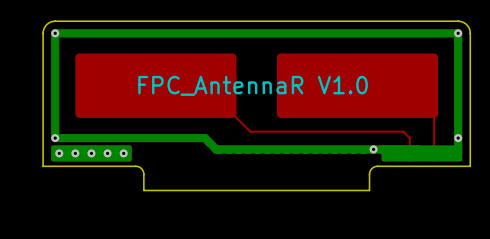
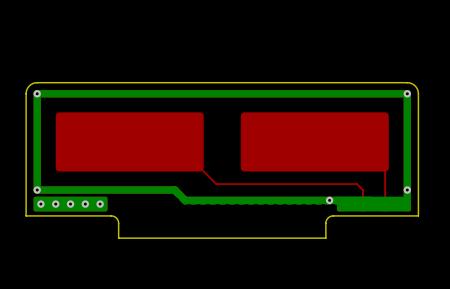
text: FPC_AntennaR V1.0 (253, 85) -> none

